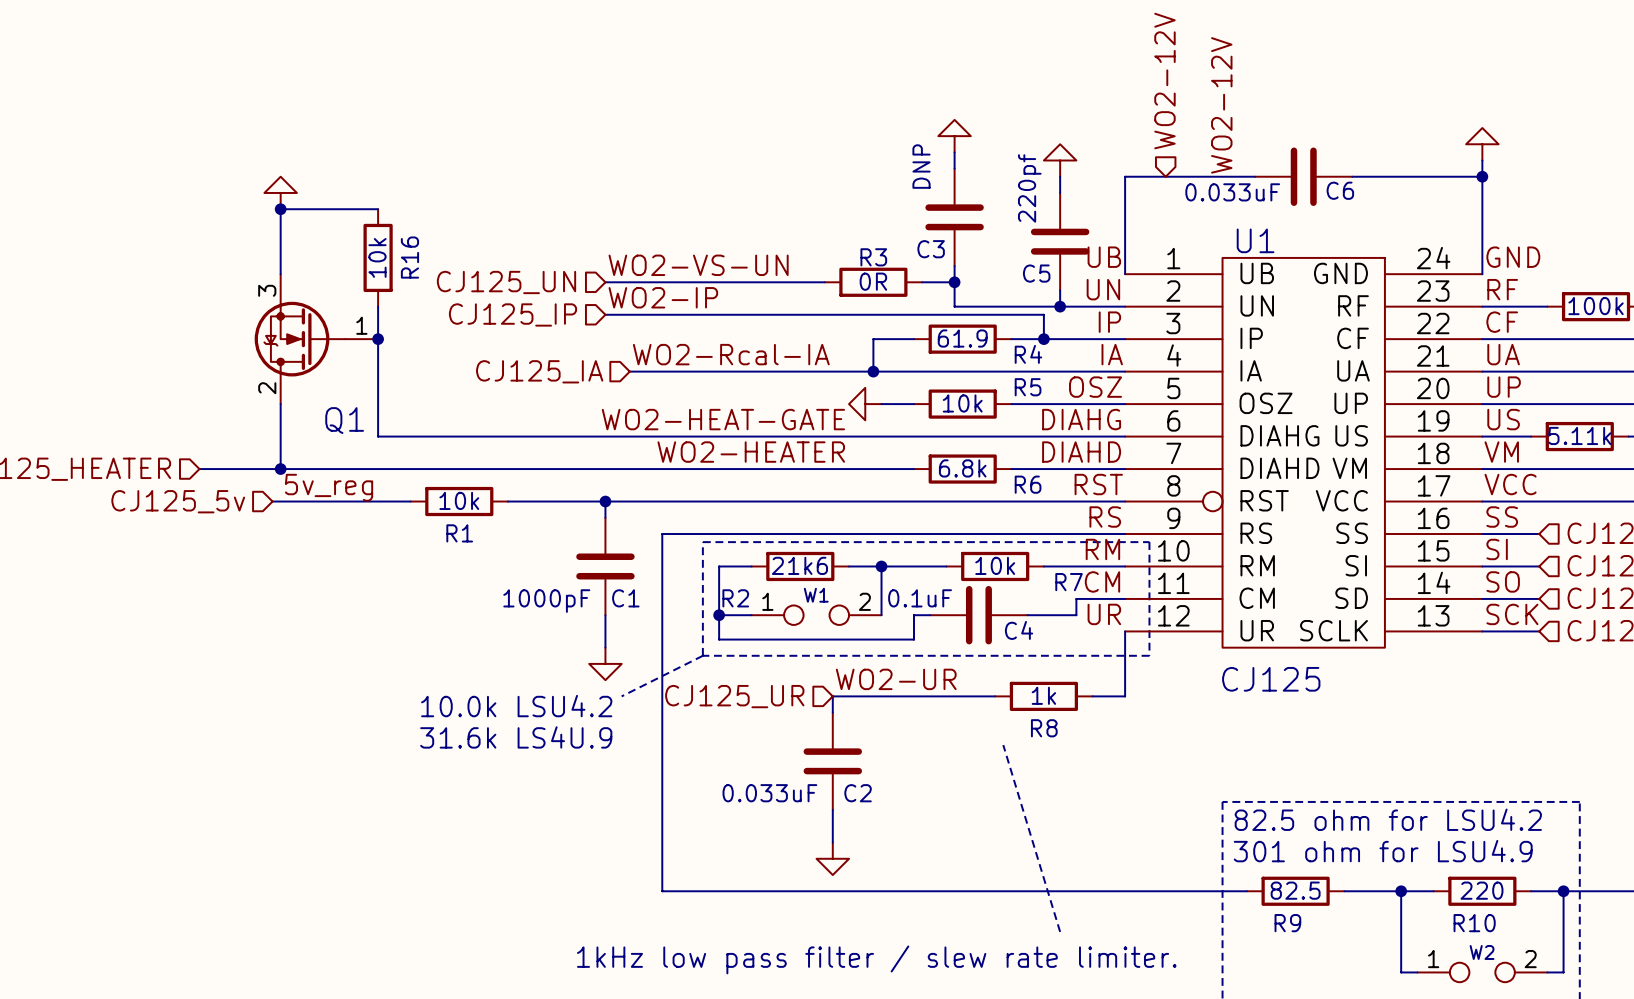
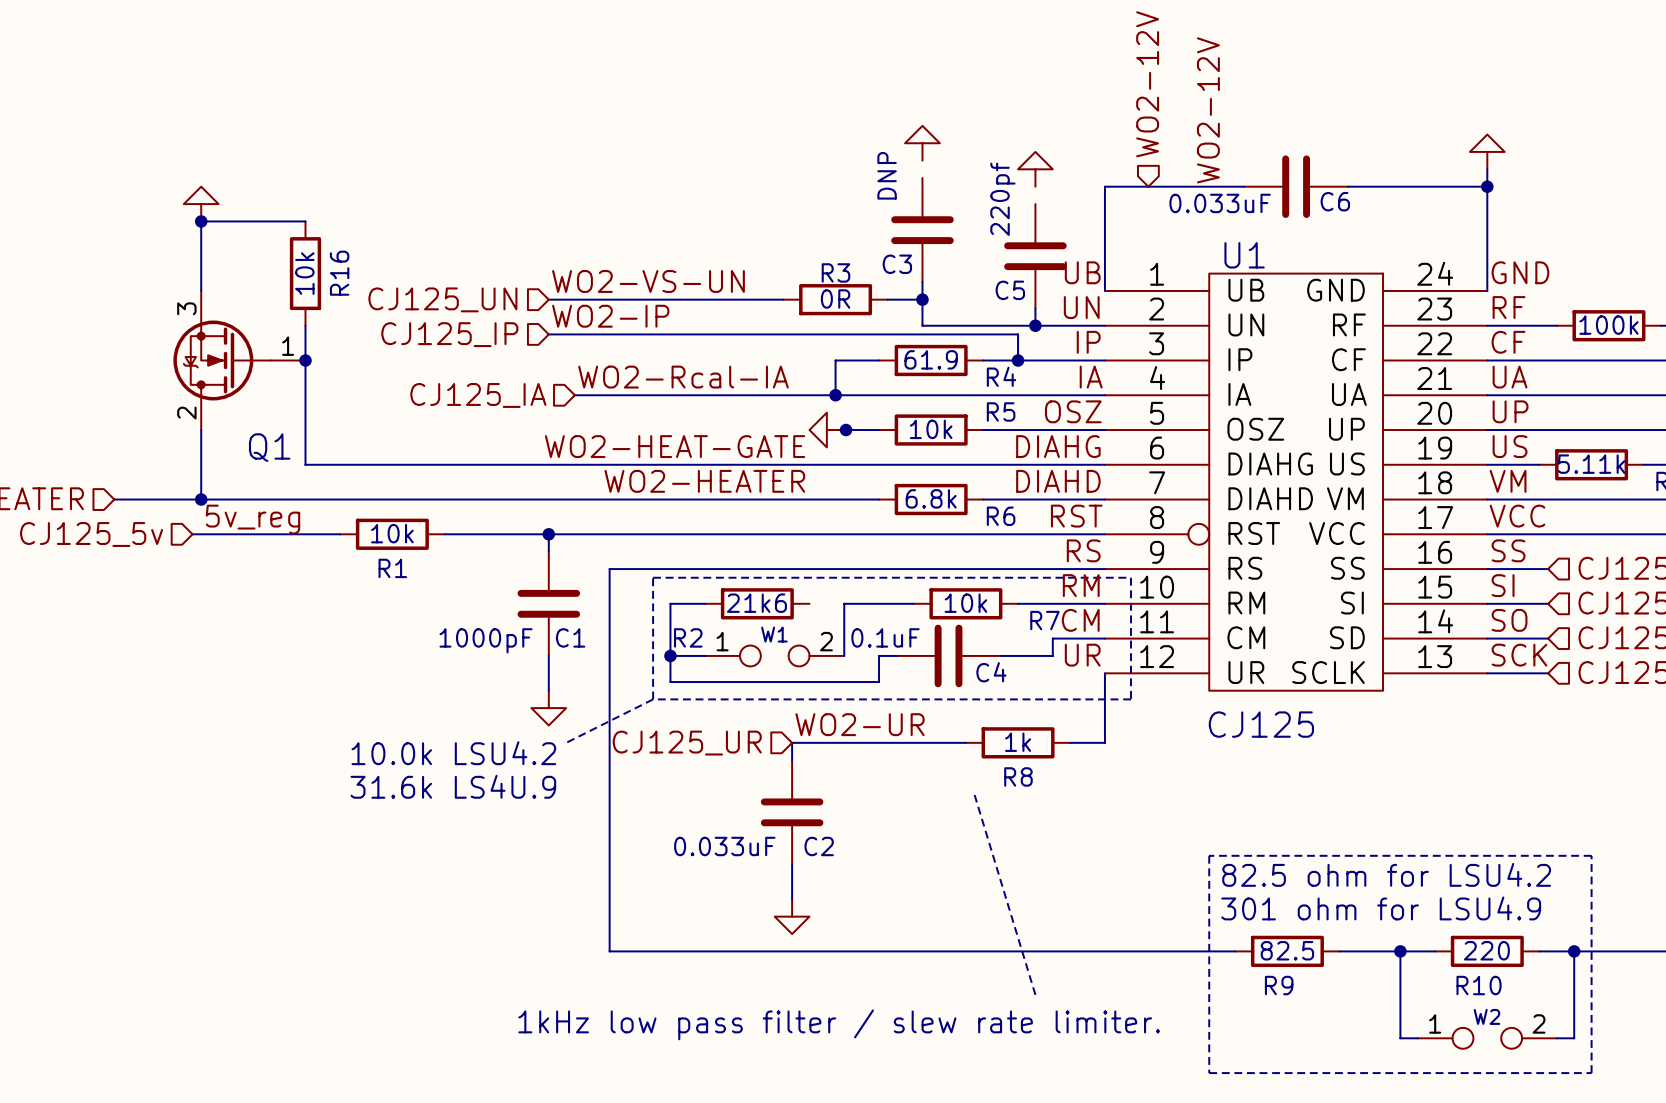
wire: (954, 152) (954, 168) -> none
wire: (1060, 176) (1060, 192) -> none
junction: none -> (846, 430)
wire: (849, 566) (881, 566) -> none
junction: (881, 566) -> none

